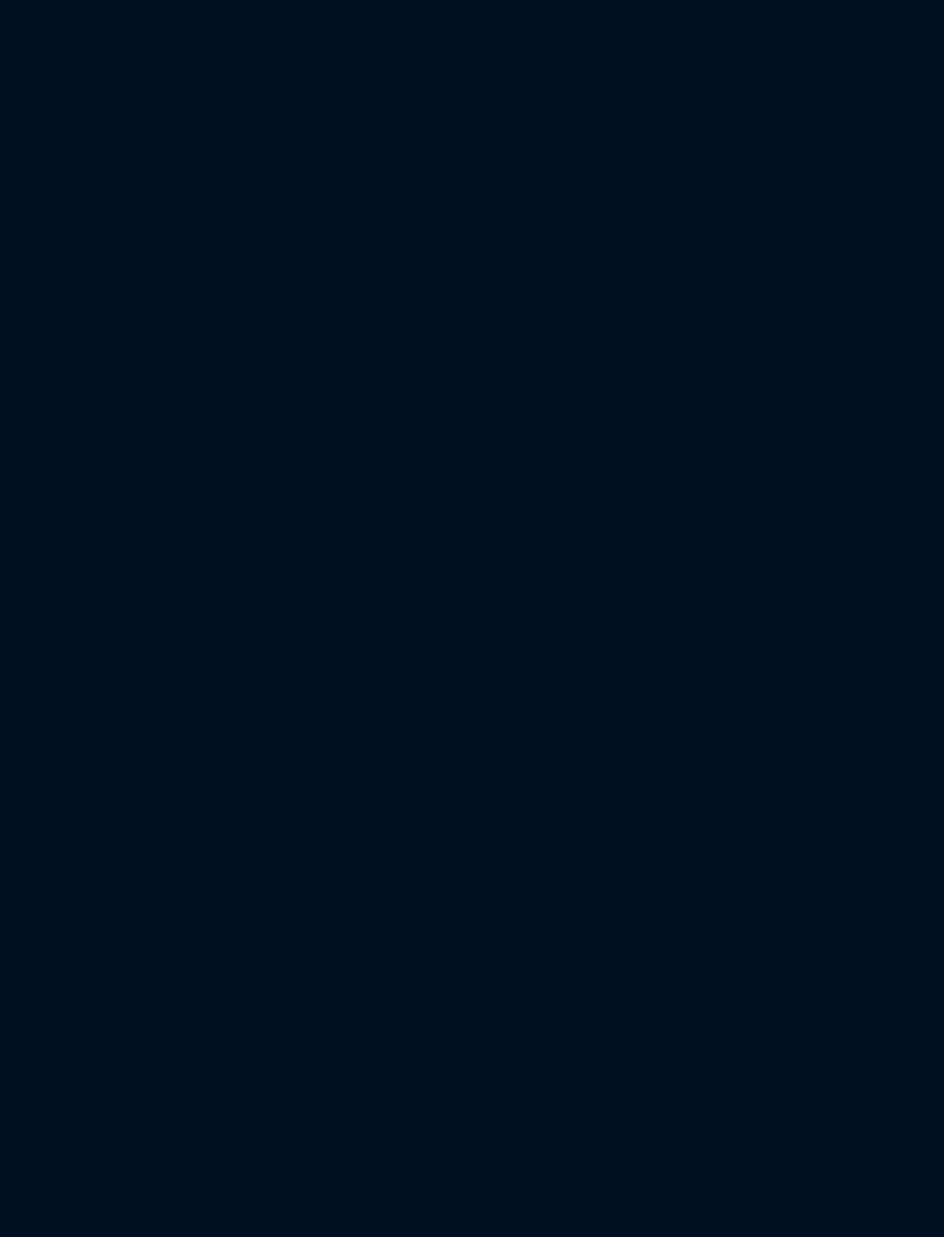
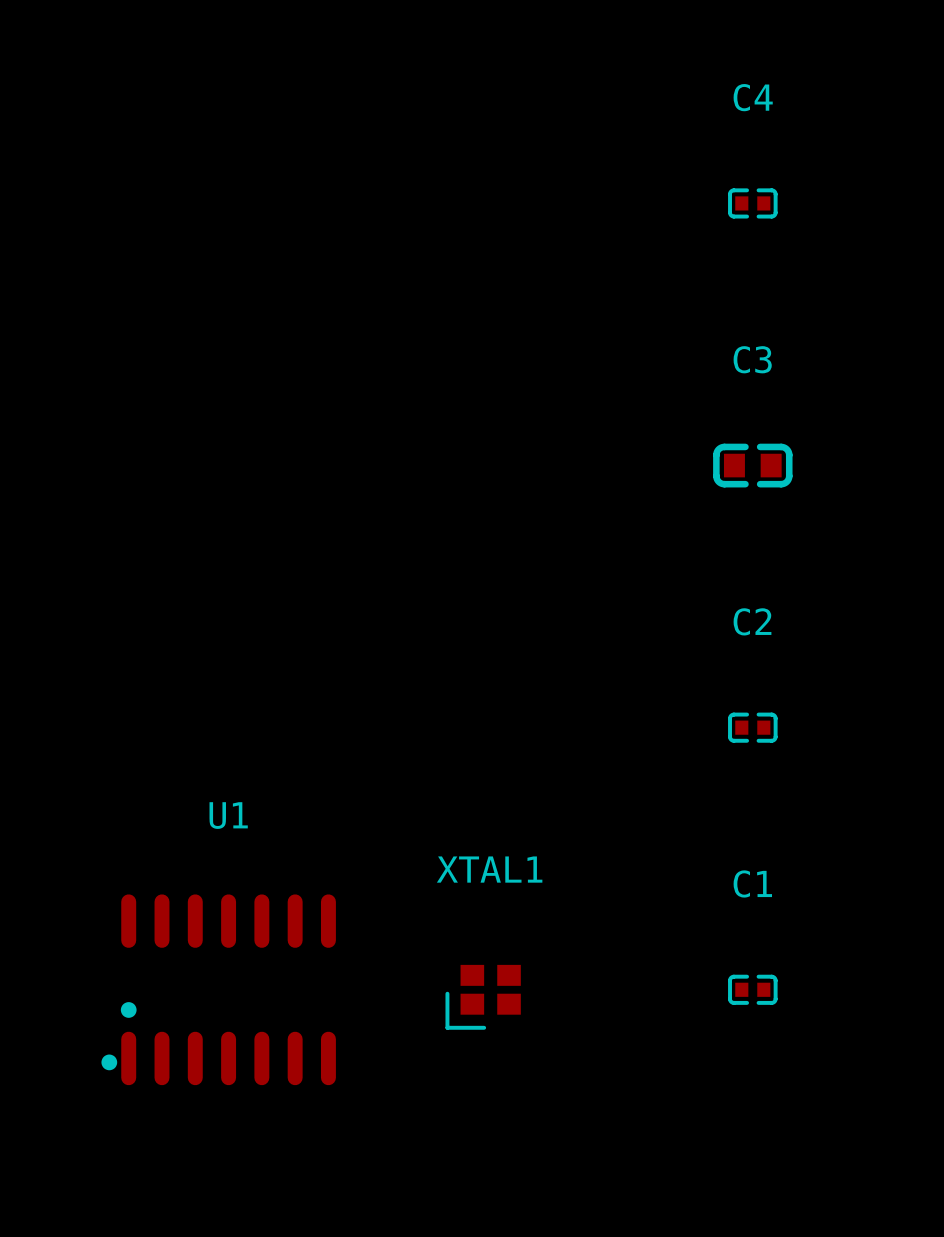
C4: none -> (752, 203)
C3: none -> (752, 465)
C2: none -> (752, 727)
U1: none -> (218, 989)
C1: none -> (752, 989)
XTAL1: none -> (483, 997)

